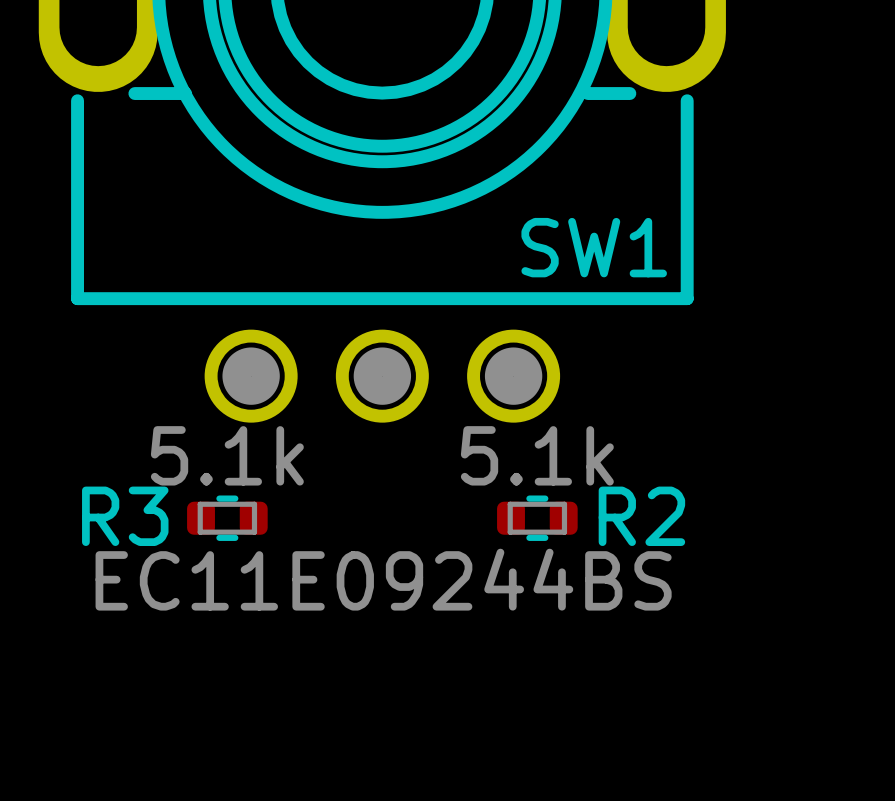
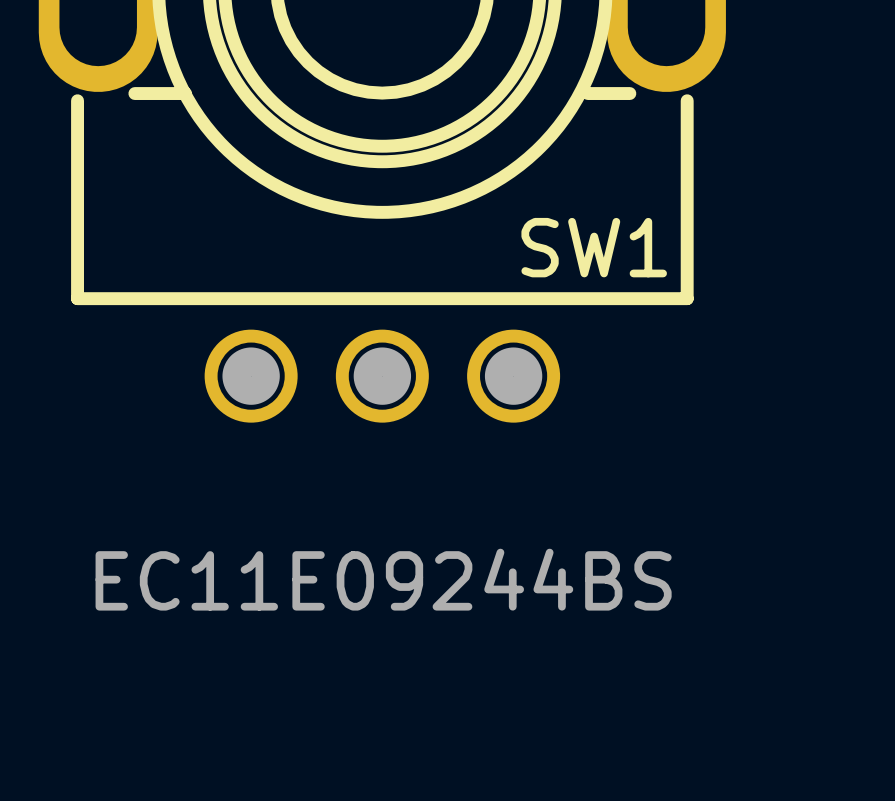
R3: 5.1k (227, 518) -> none
R2: 5.1k (537, 518) -> none

